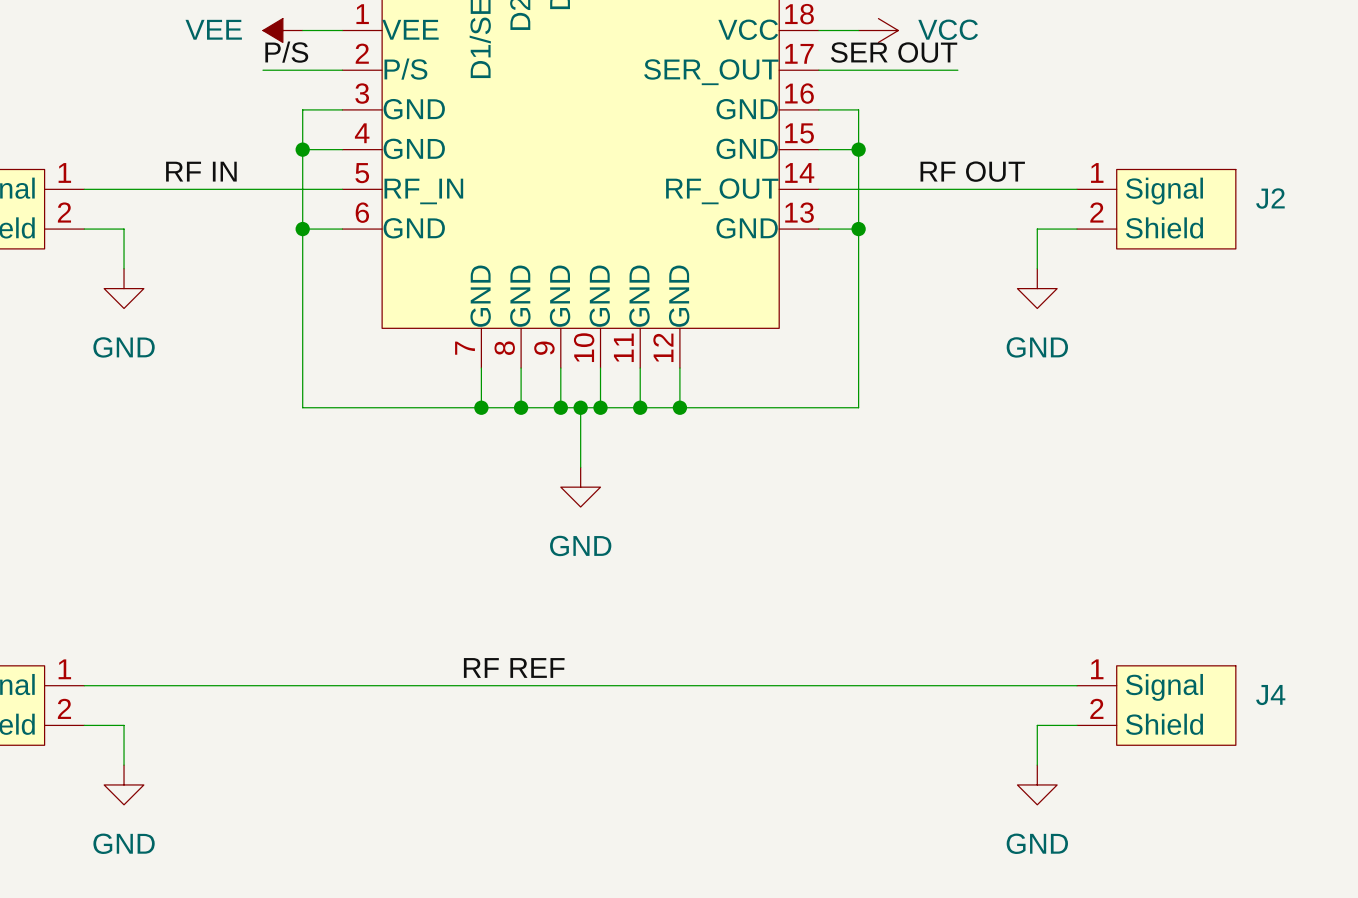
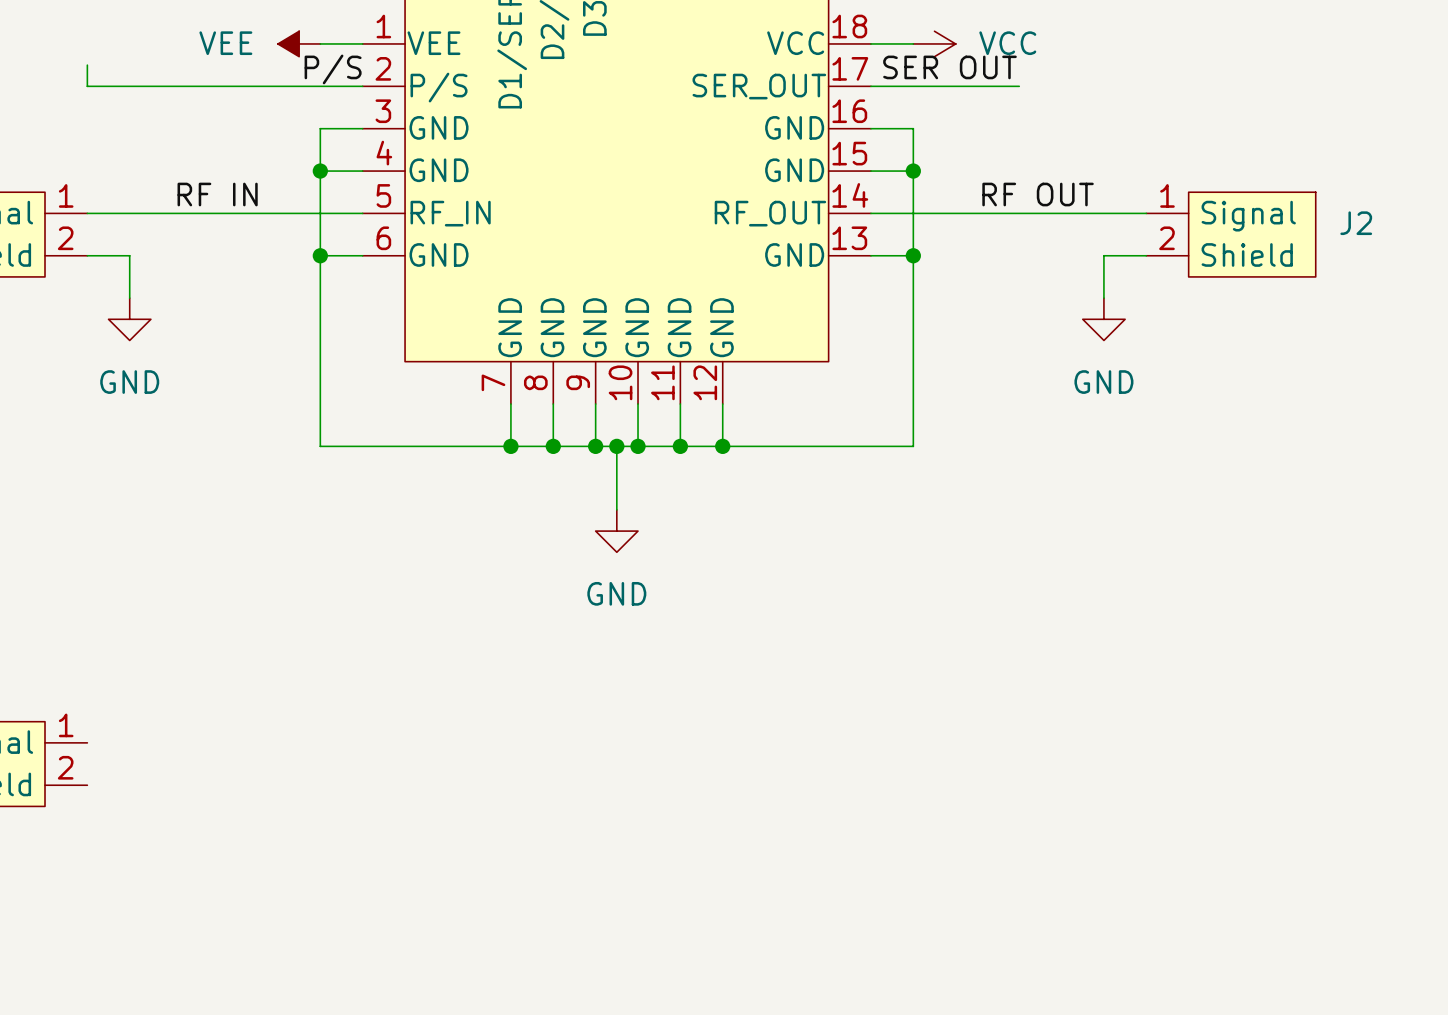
wire: none -> (87, 65) (87, 86) (277, 86)
label position: P/S (286, 52) -> P/S (333, 69)
label: RF REF (514, 667) -> none
wire: (84, 685) (1077, 685) -> none
J4: (1156, 705) -> none
wire: (84, 725) (124, 725) (124, 765) -> none
wire: (1077, 725) (1037, 725) (1037, 765) -> none
power symbol: GND (124, 784) -> none
power symbol: GND (1037, 784) -> none

